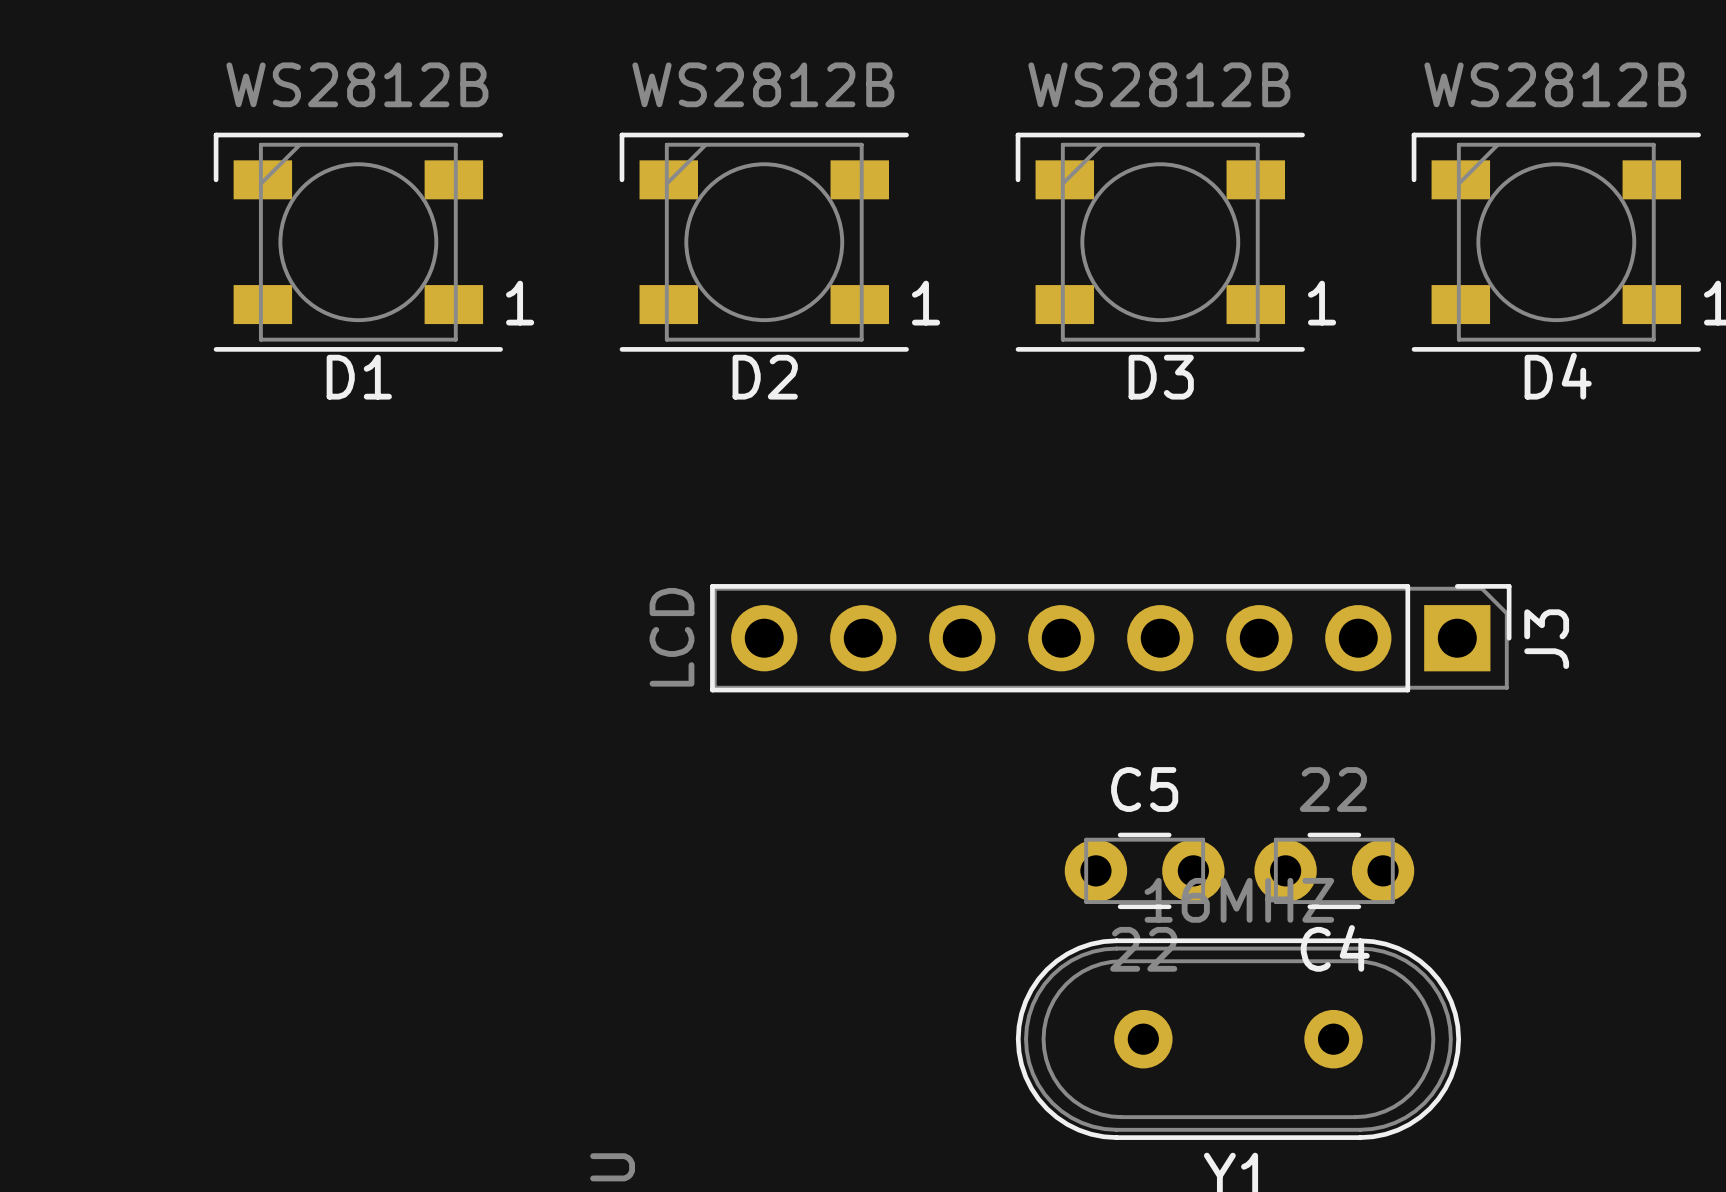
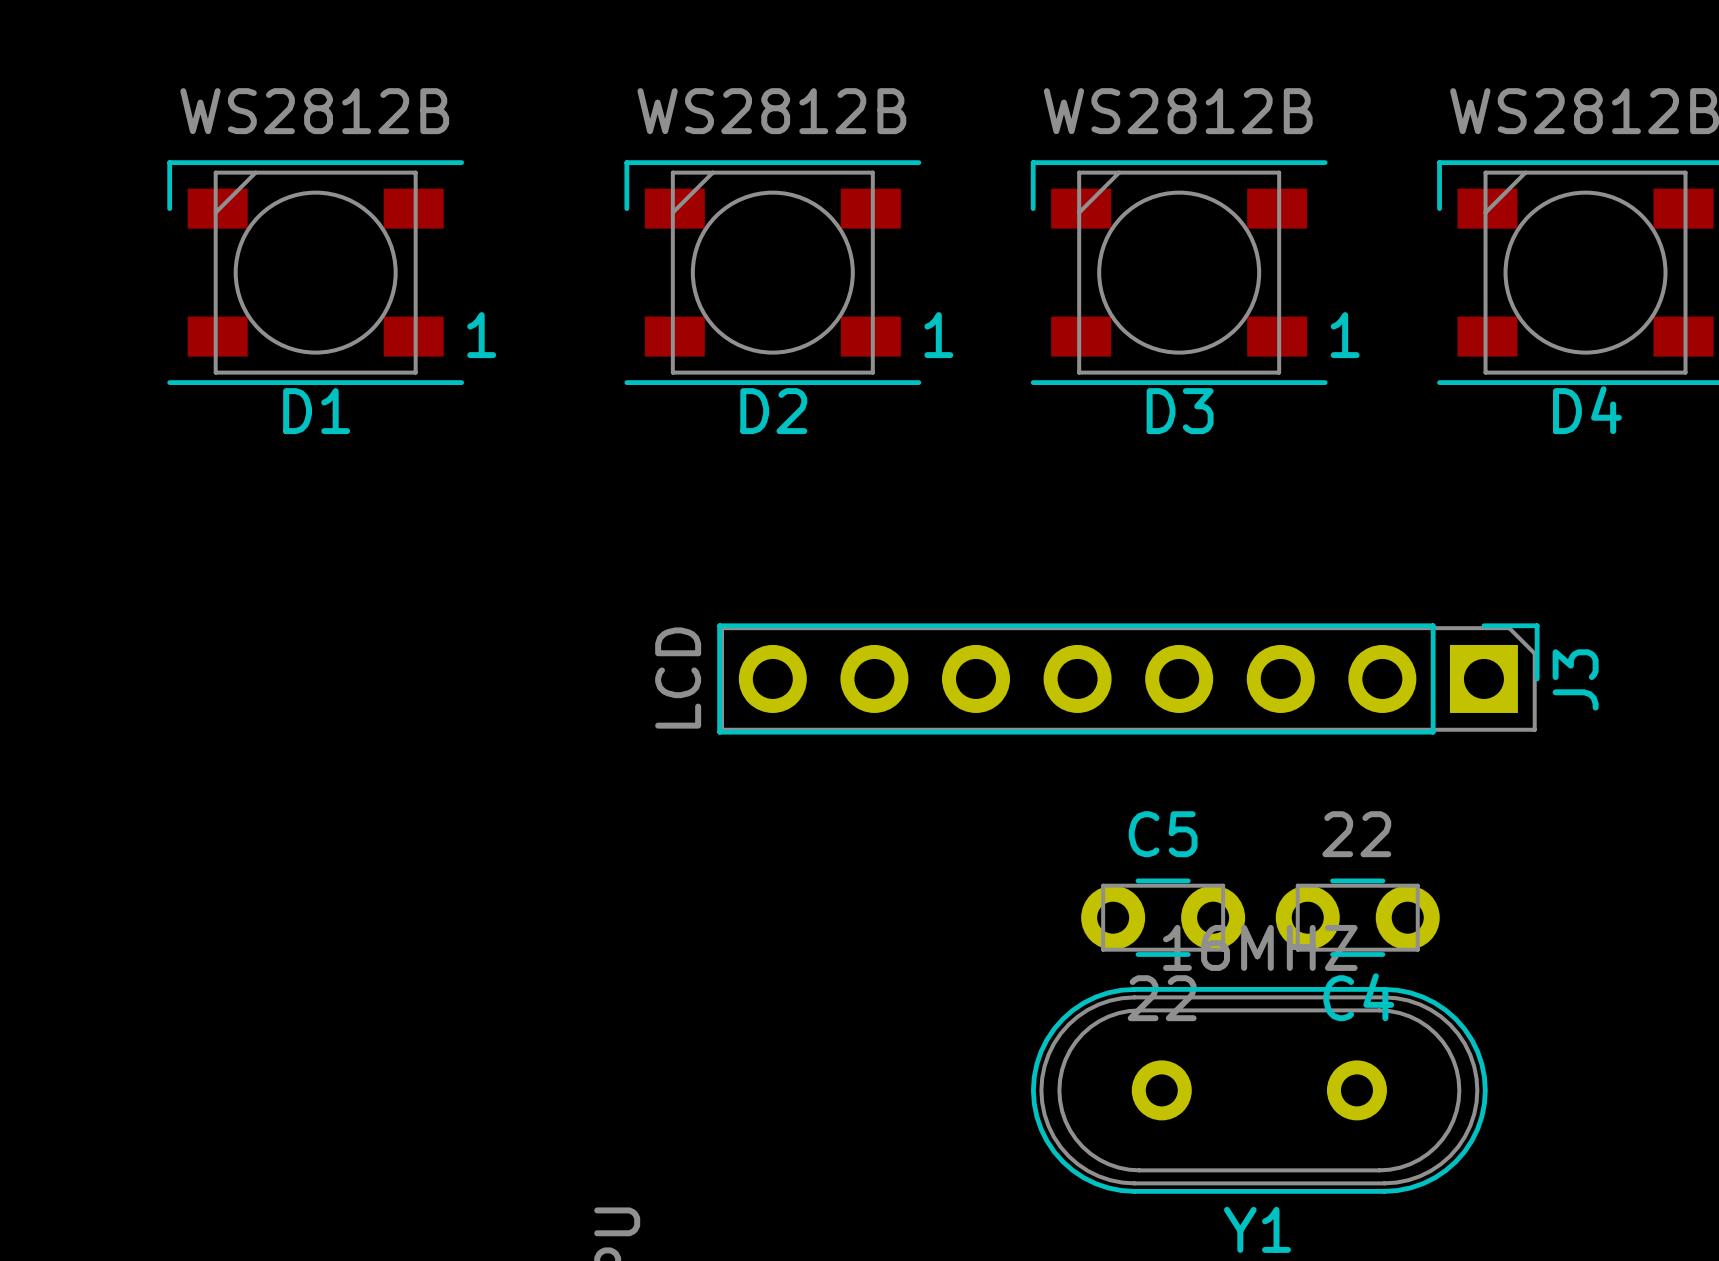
D1 position: (358, 242) -> (315, 272)

